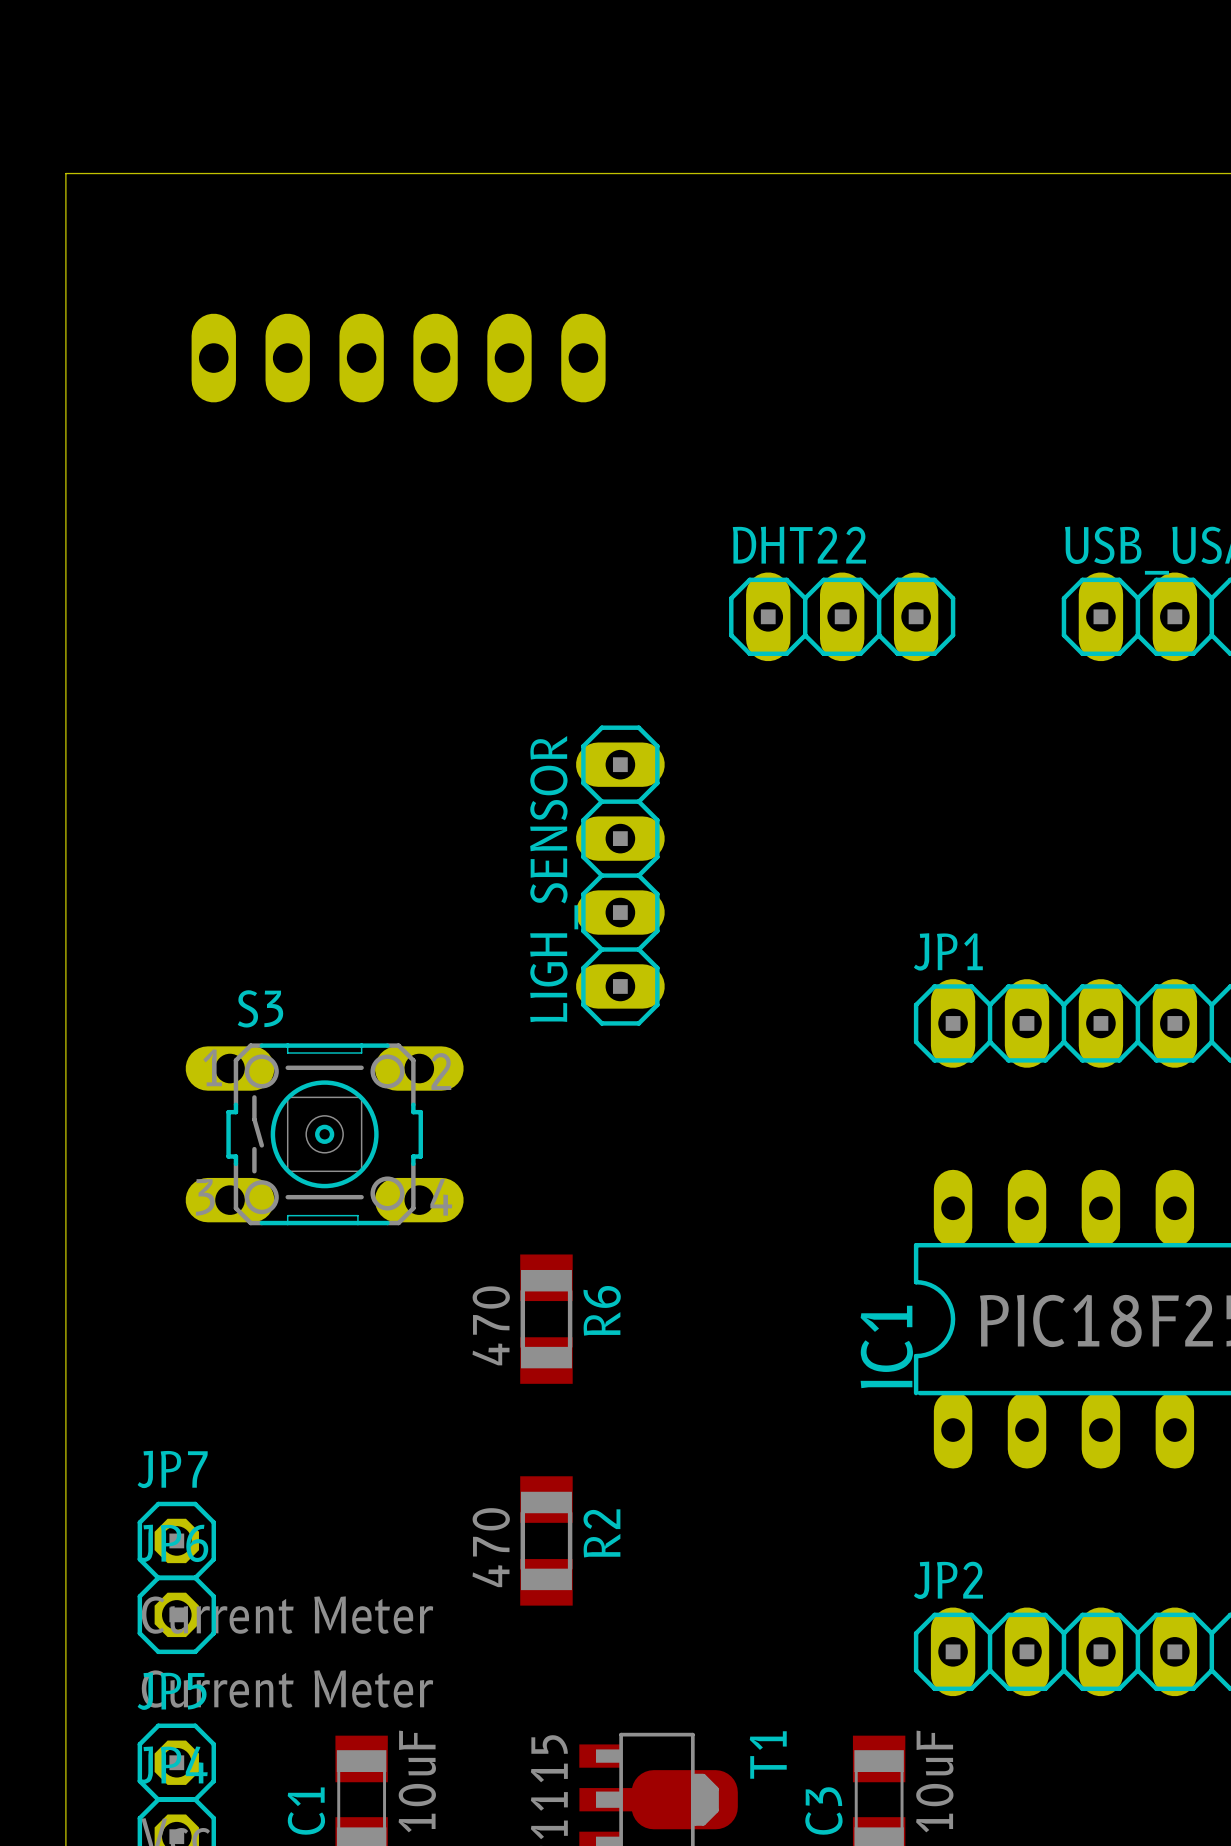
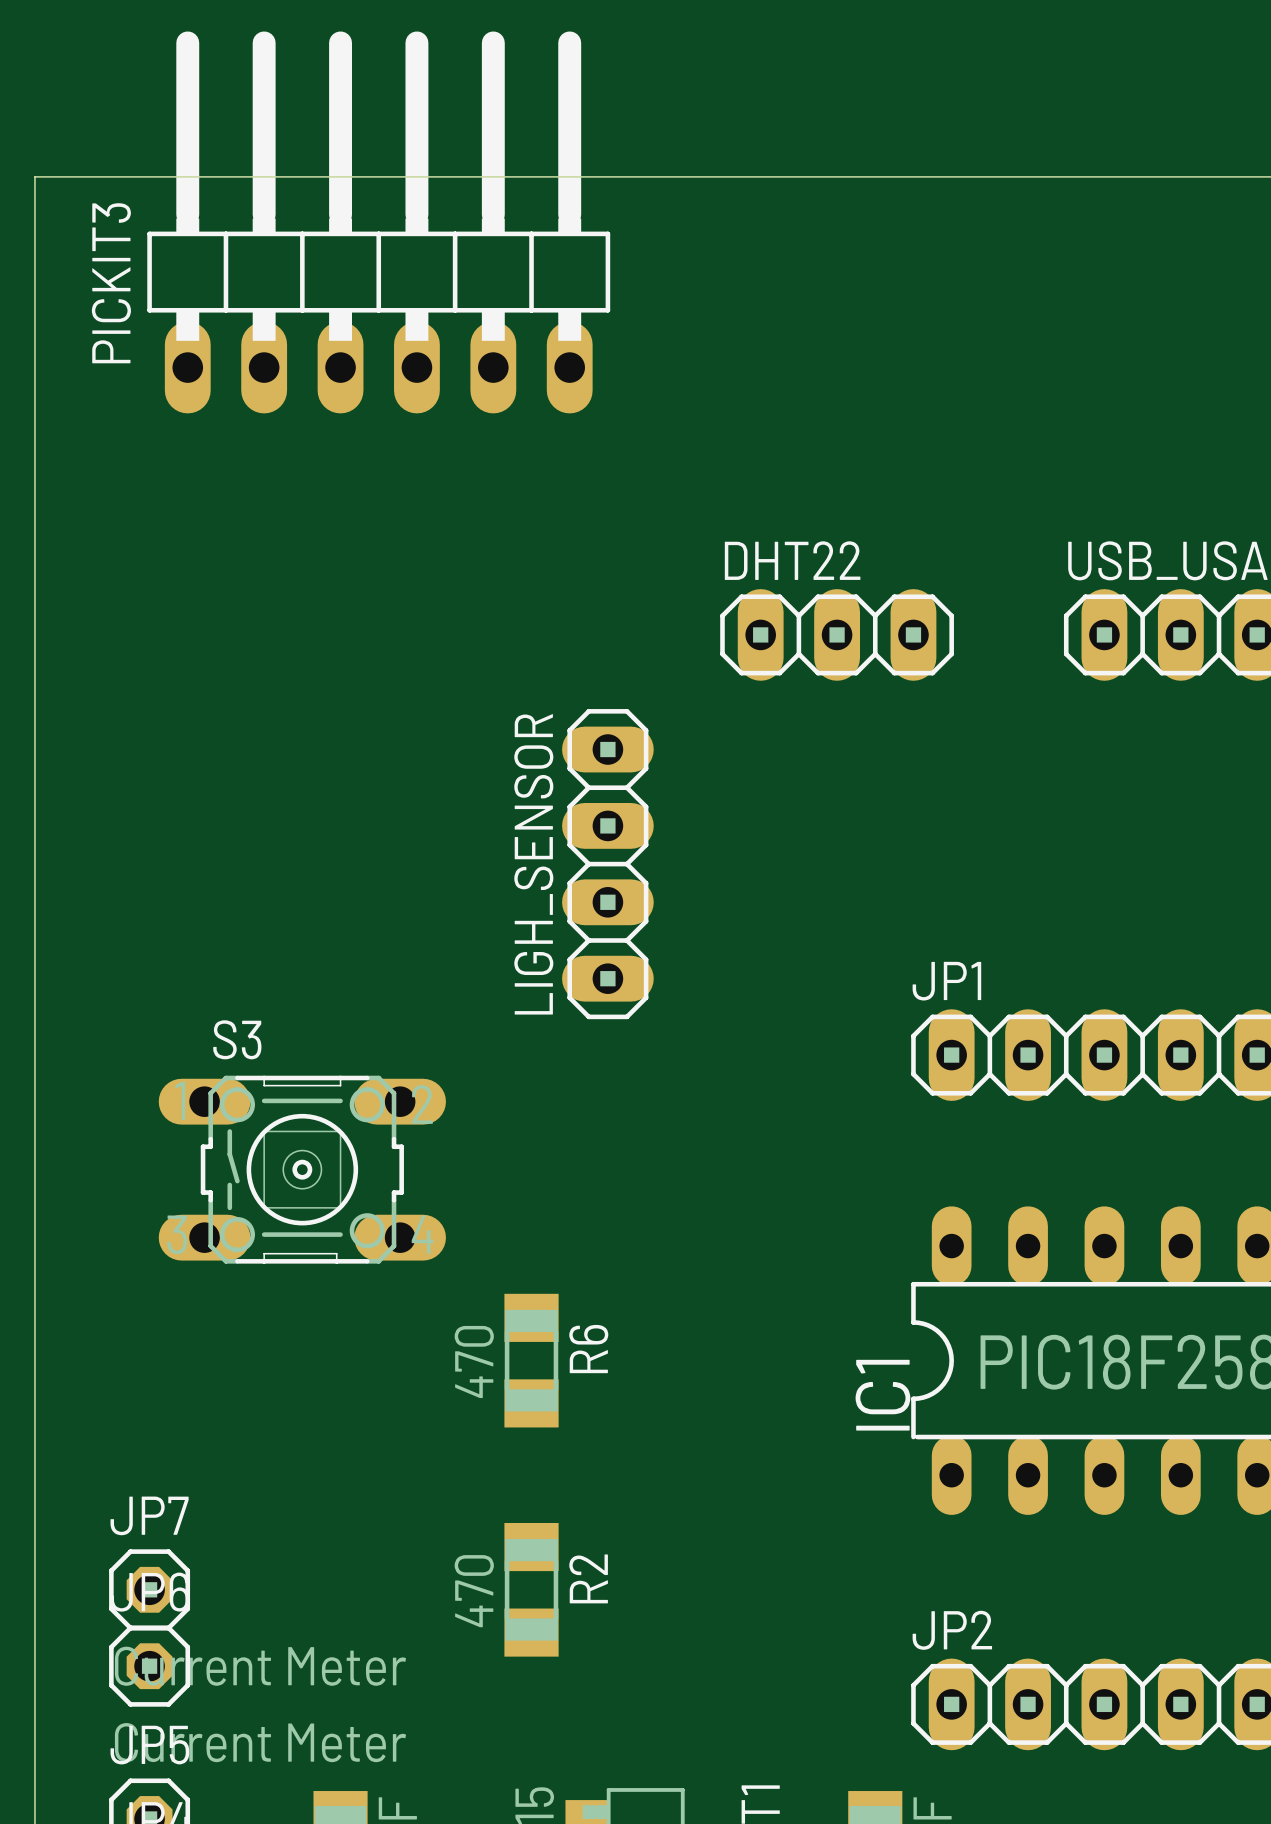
PICKIT3 side: bottom (398, 358) -> top (378, 222)
LIGH_SENSOR position: (620, 875) -> (607, 864)

